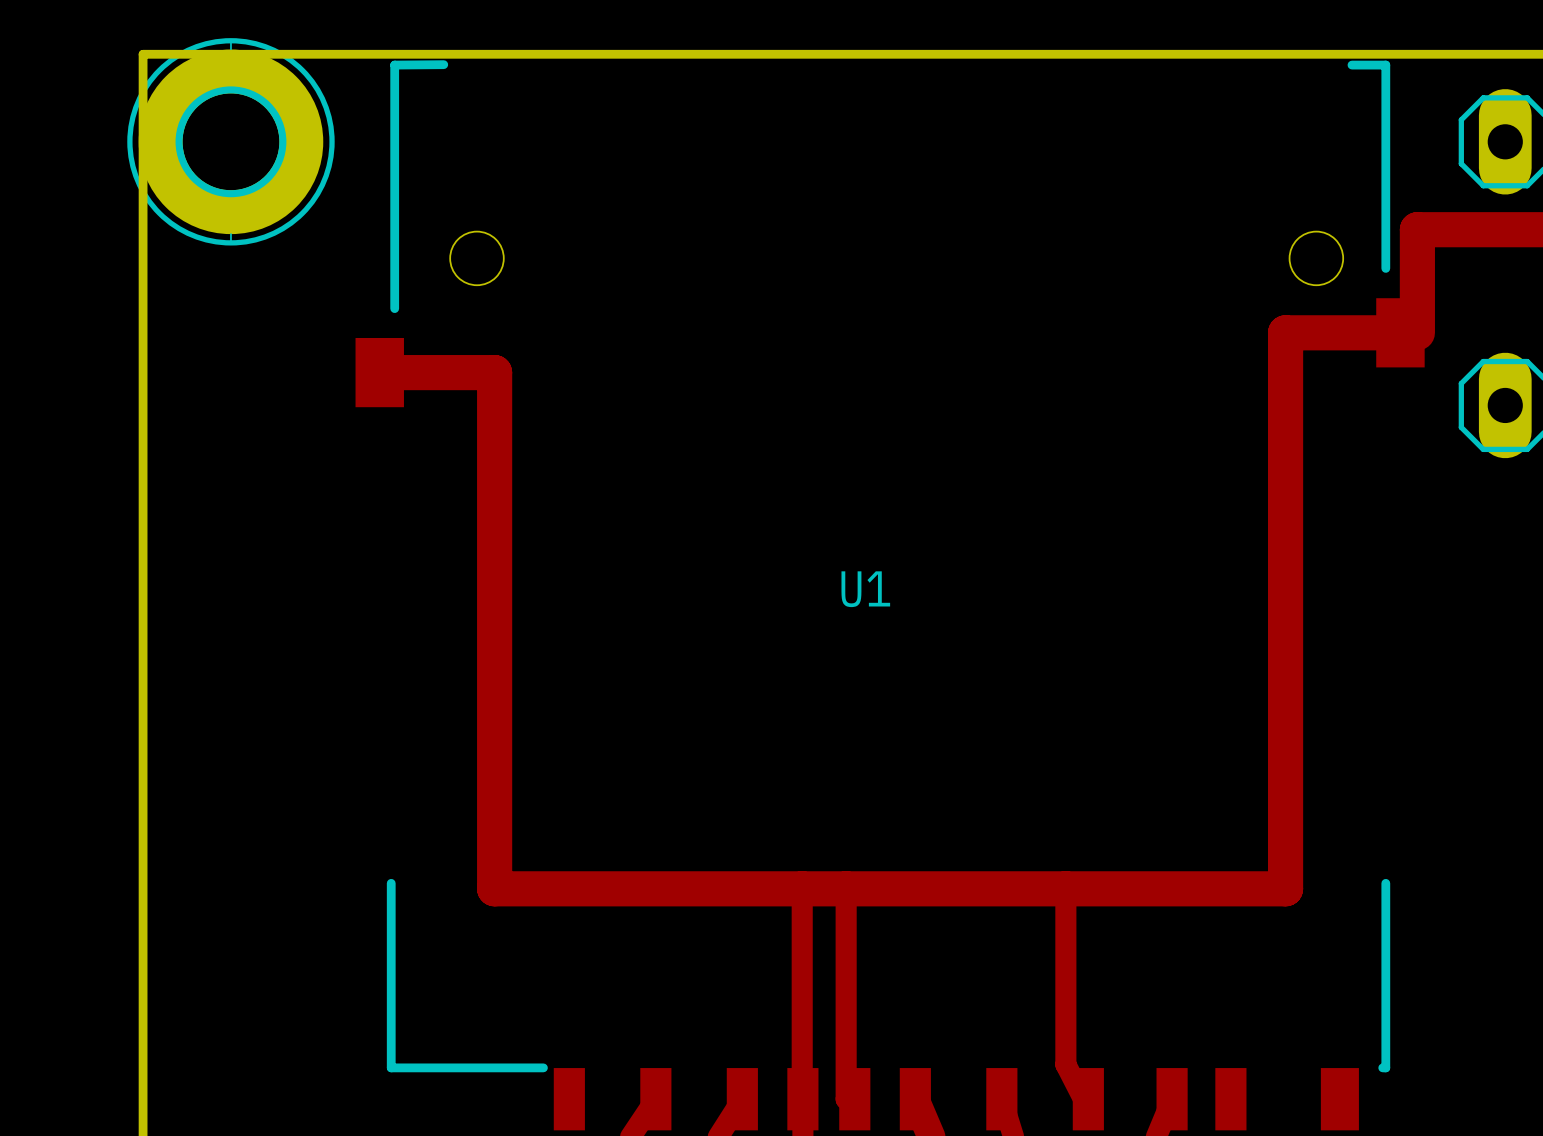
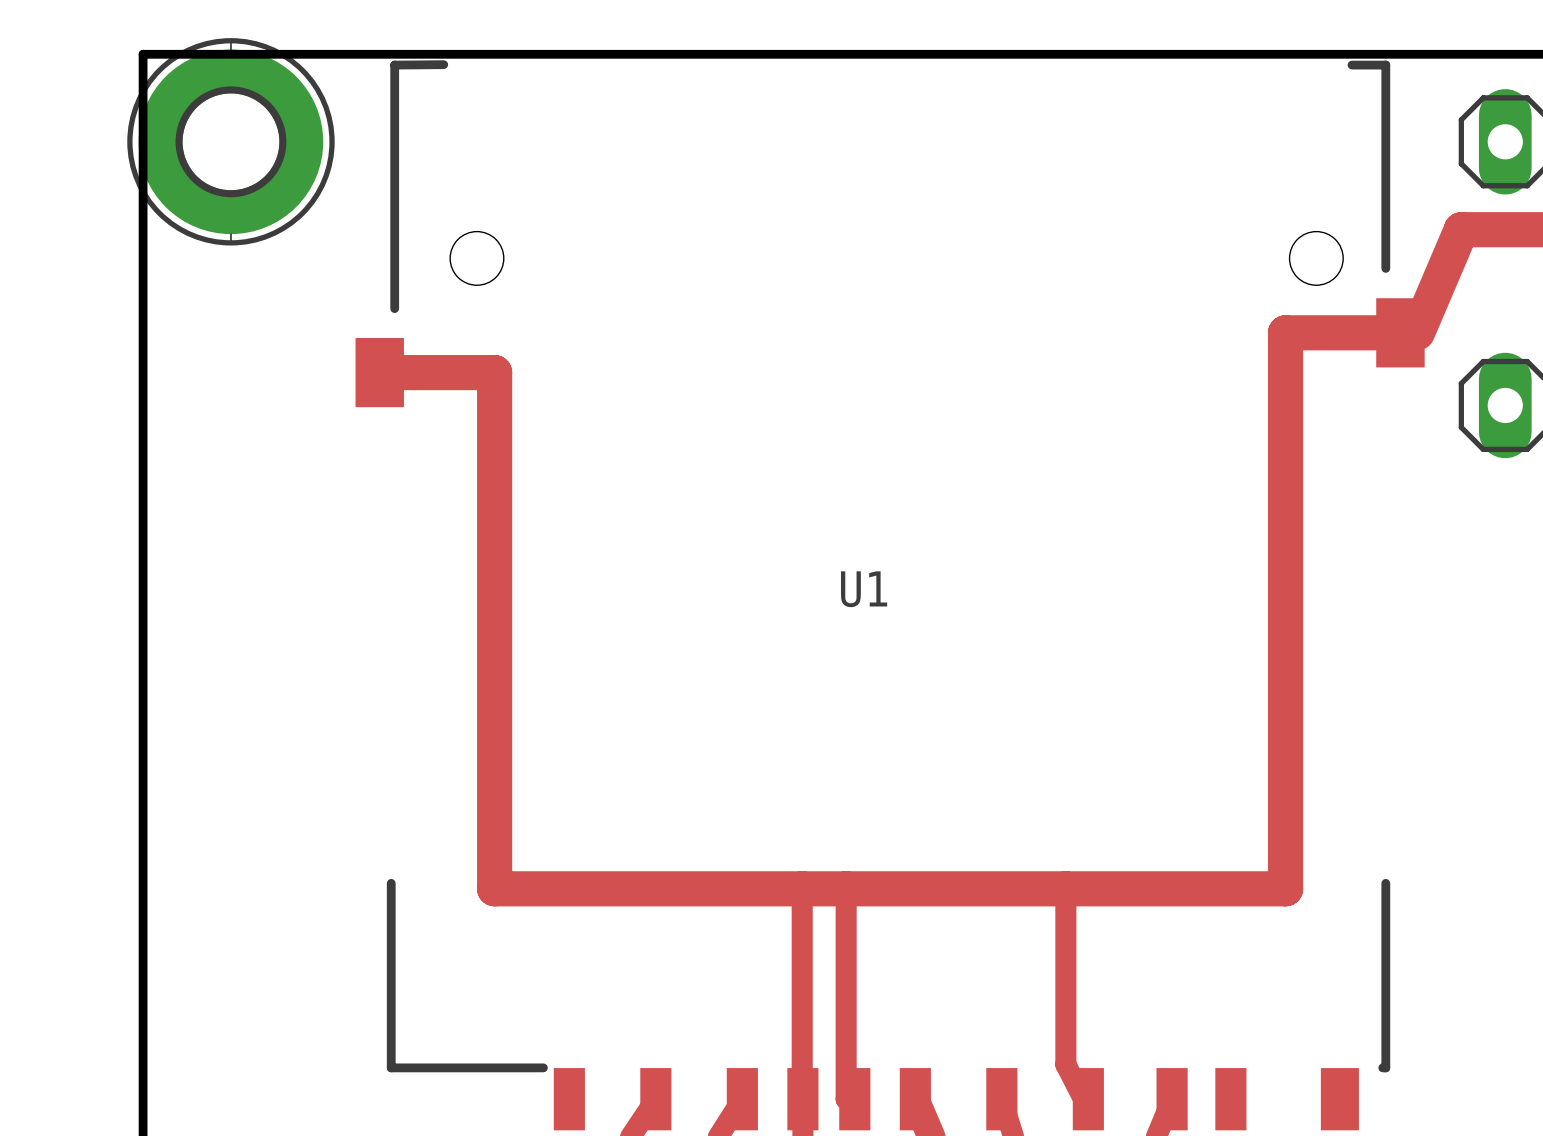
top track: (1461, 229) (1417, 229) (1417, 332) -> (1461, 229) (1417, 332)

